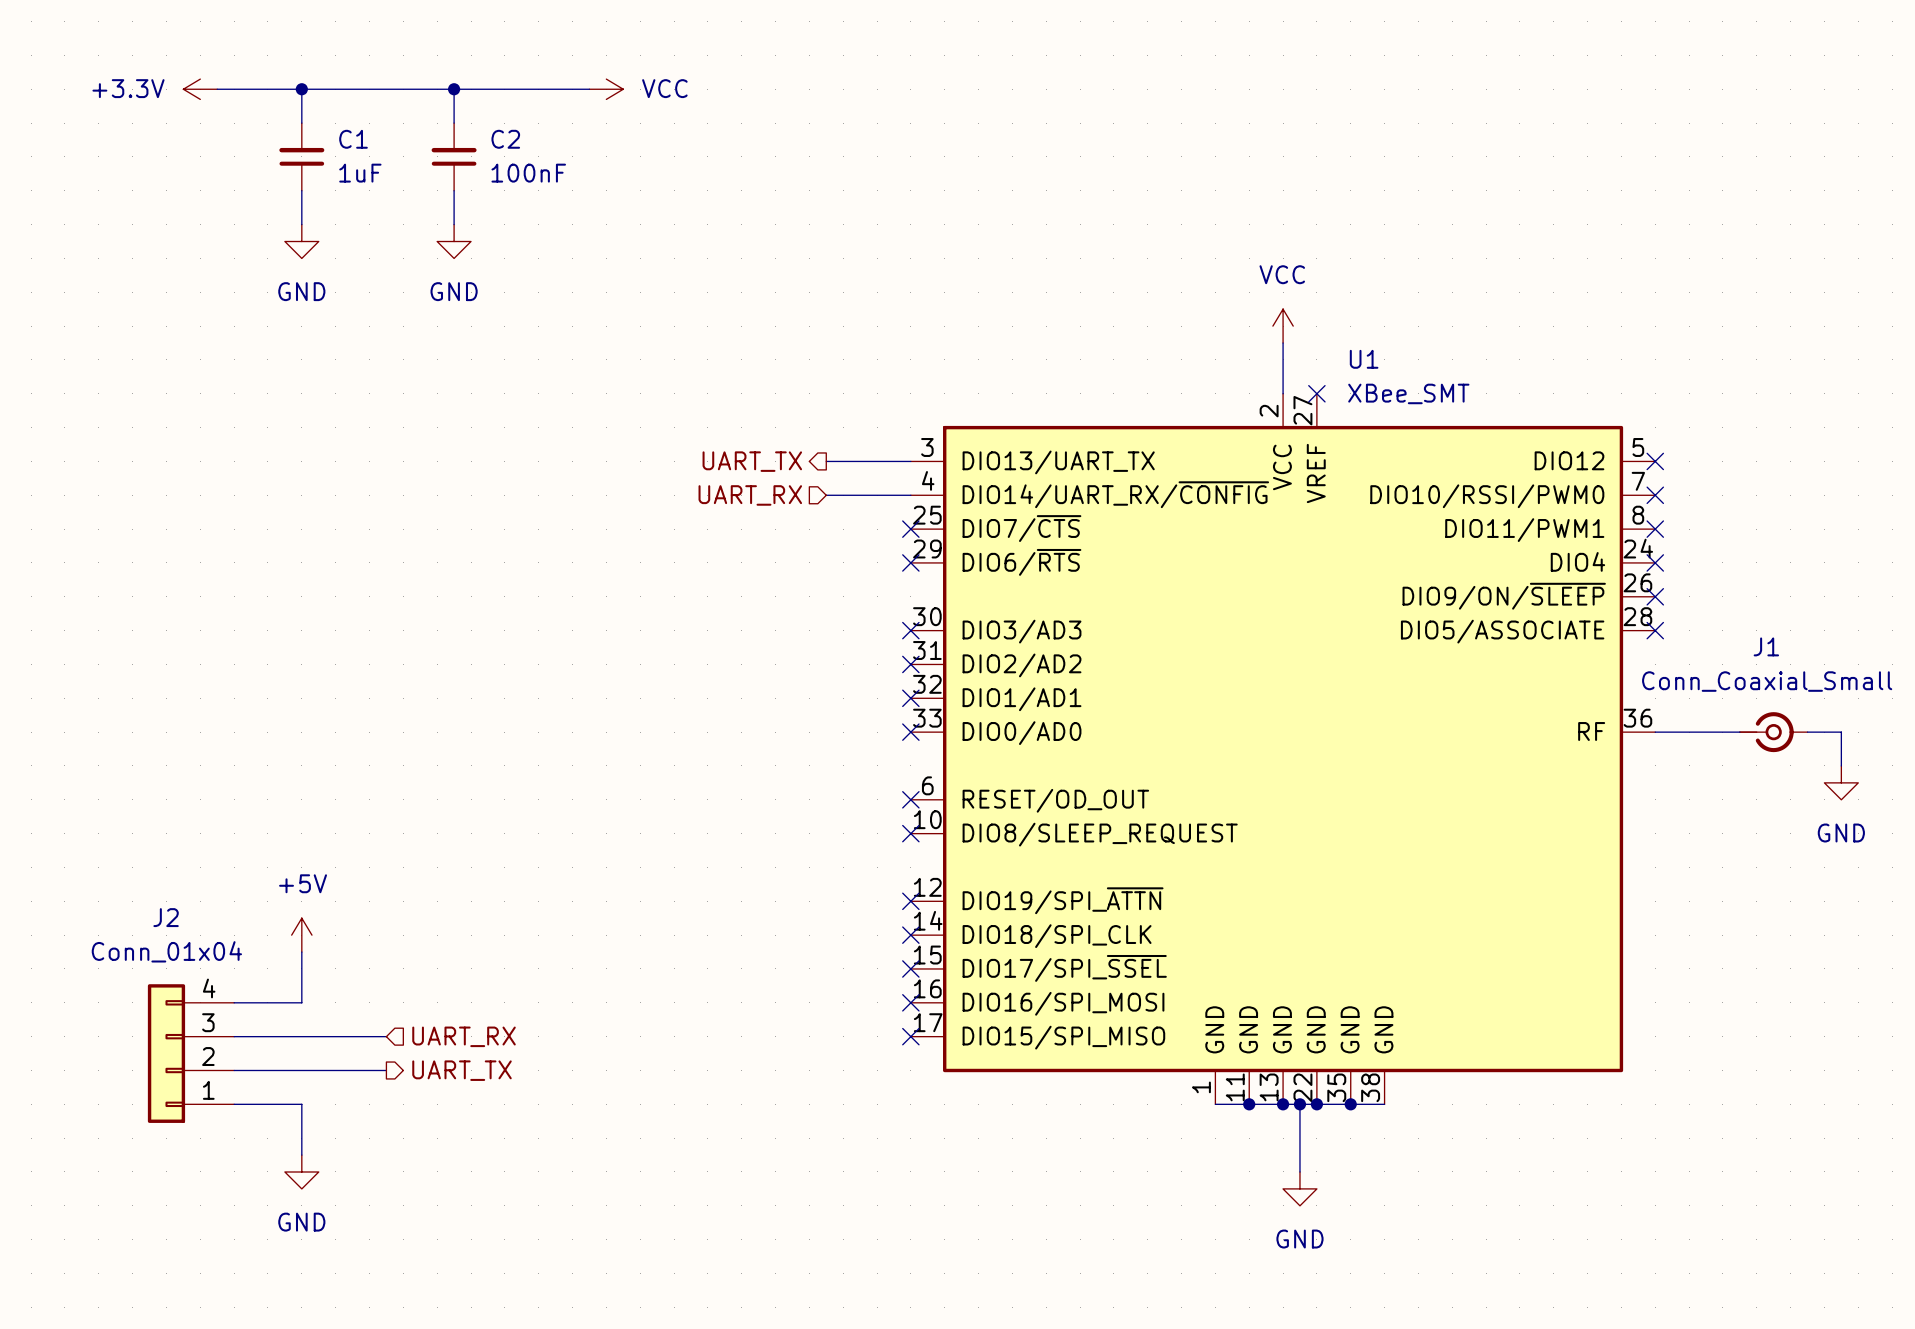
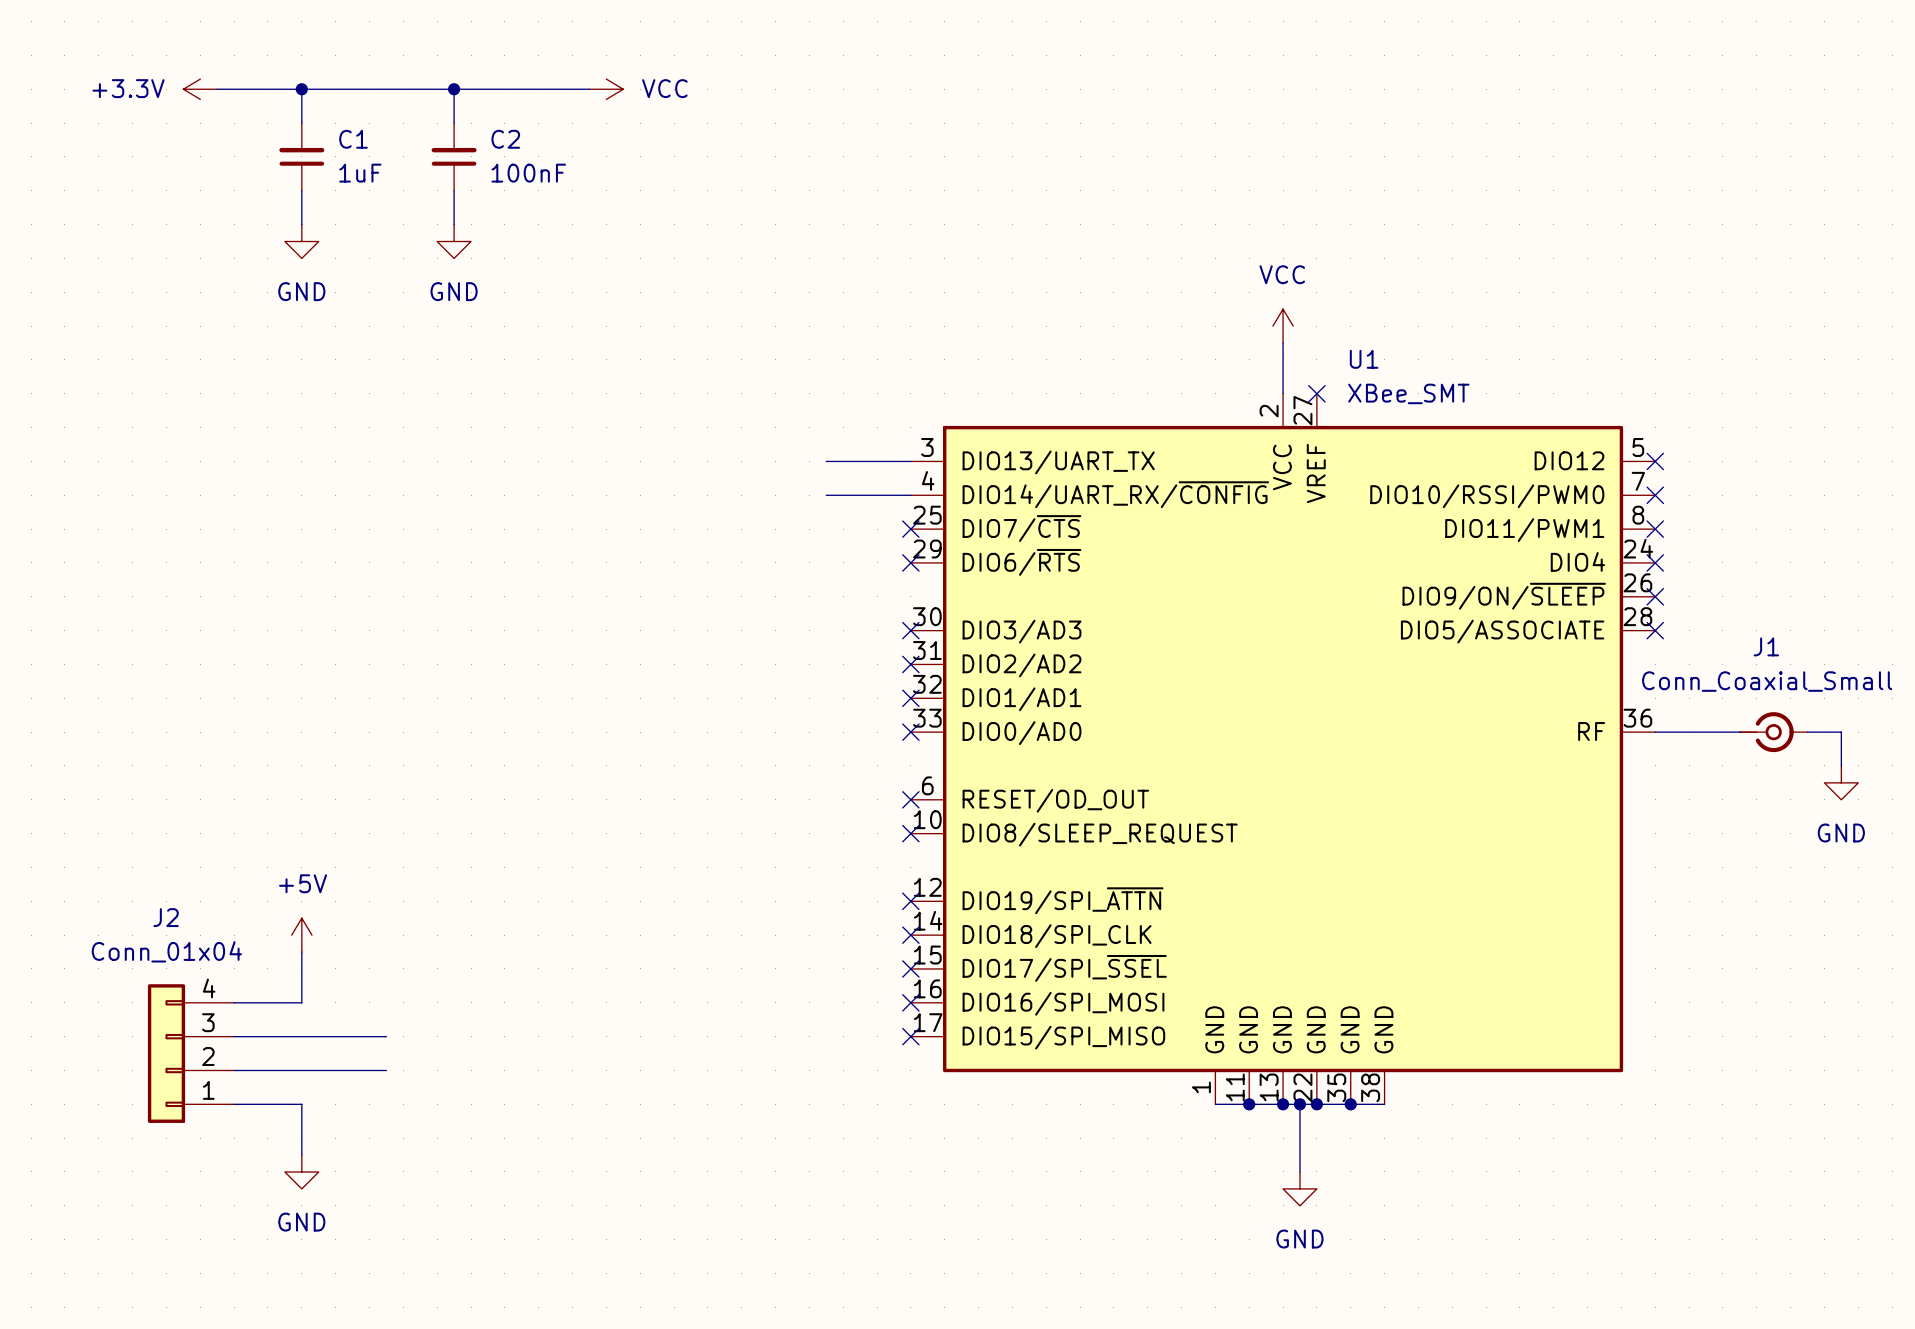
hierarchical label: UART_TX (752, 461) -> none
hierarchical label: UART_RX (750, 495) -> none
hierarchical label: UART_RX (464, 1036) -> none
hierarchical label: UART_TX (462, 1070) -> none

